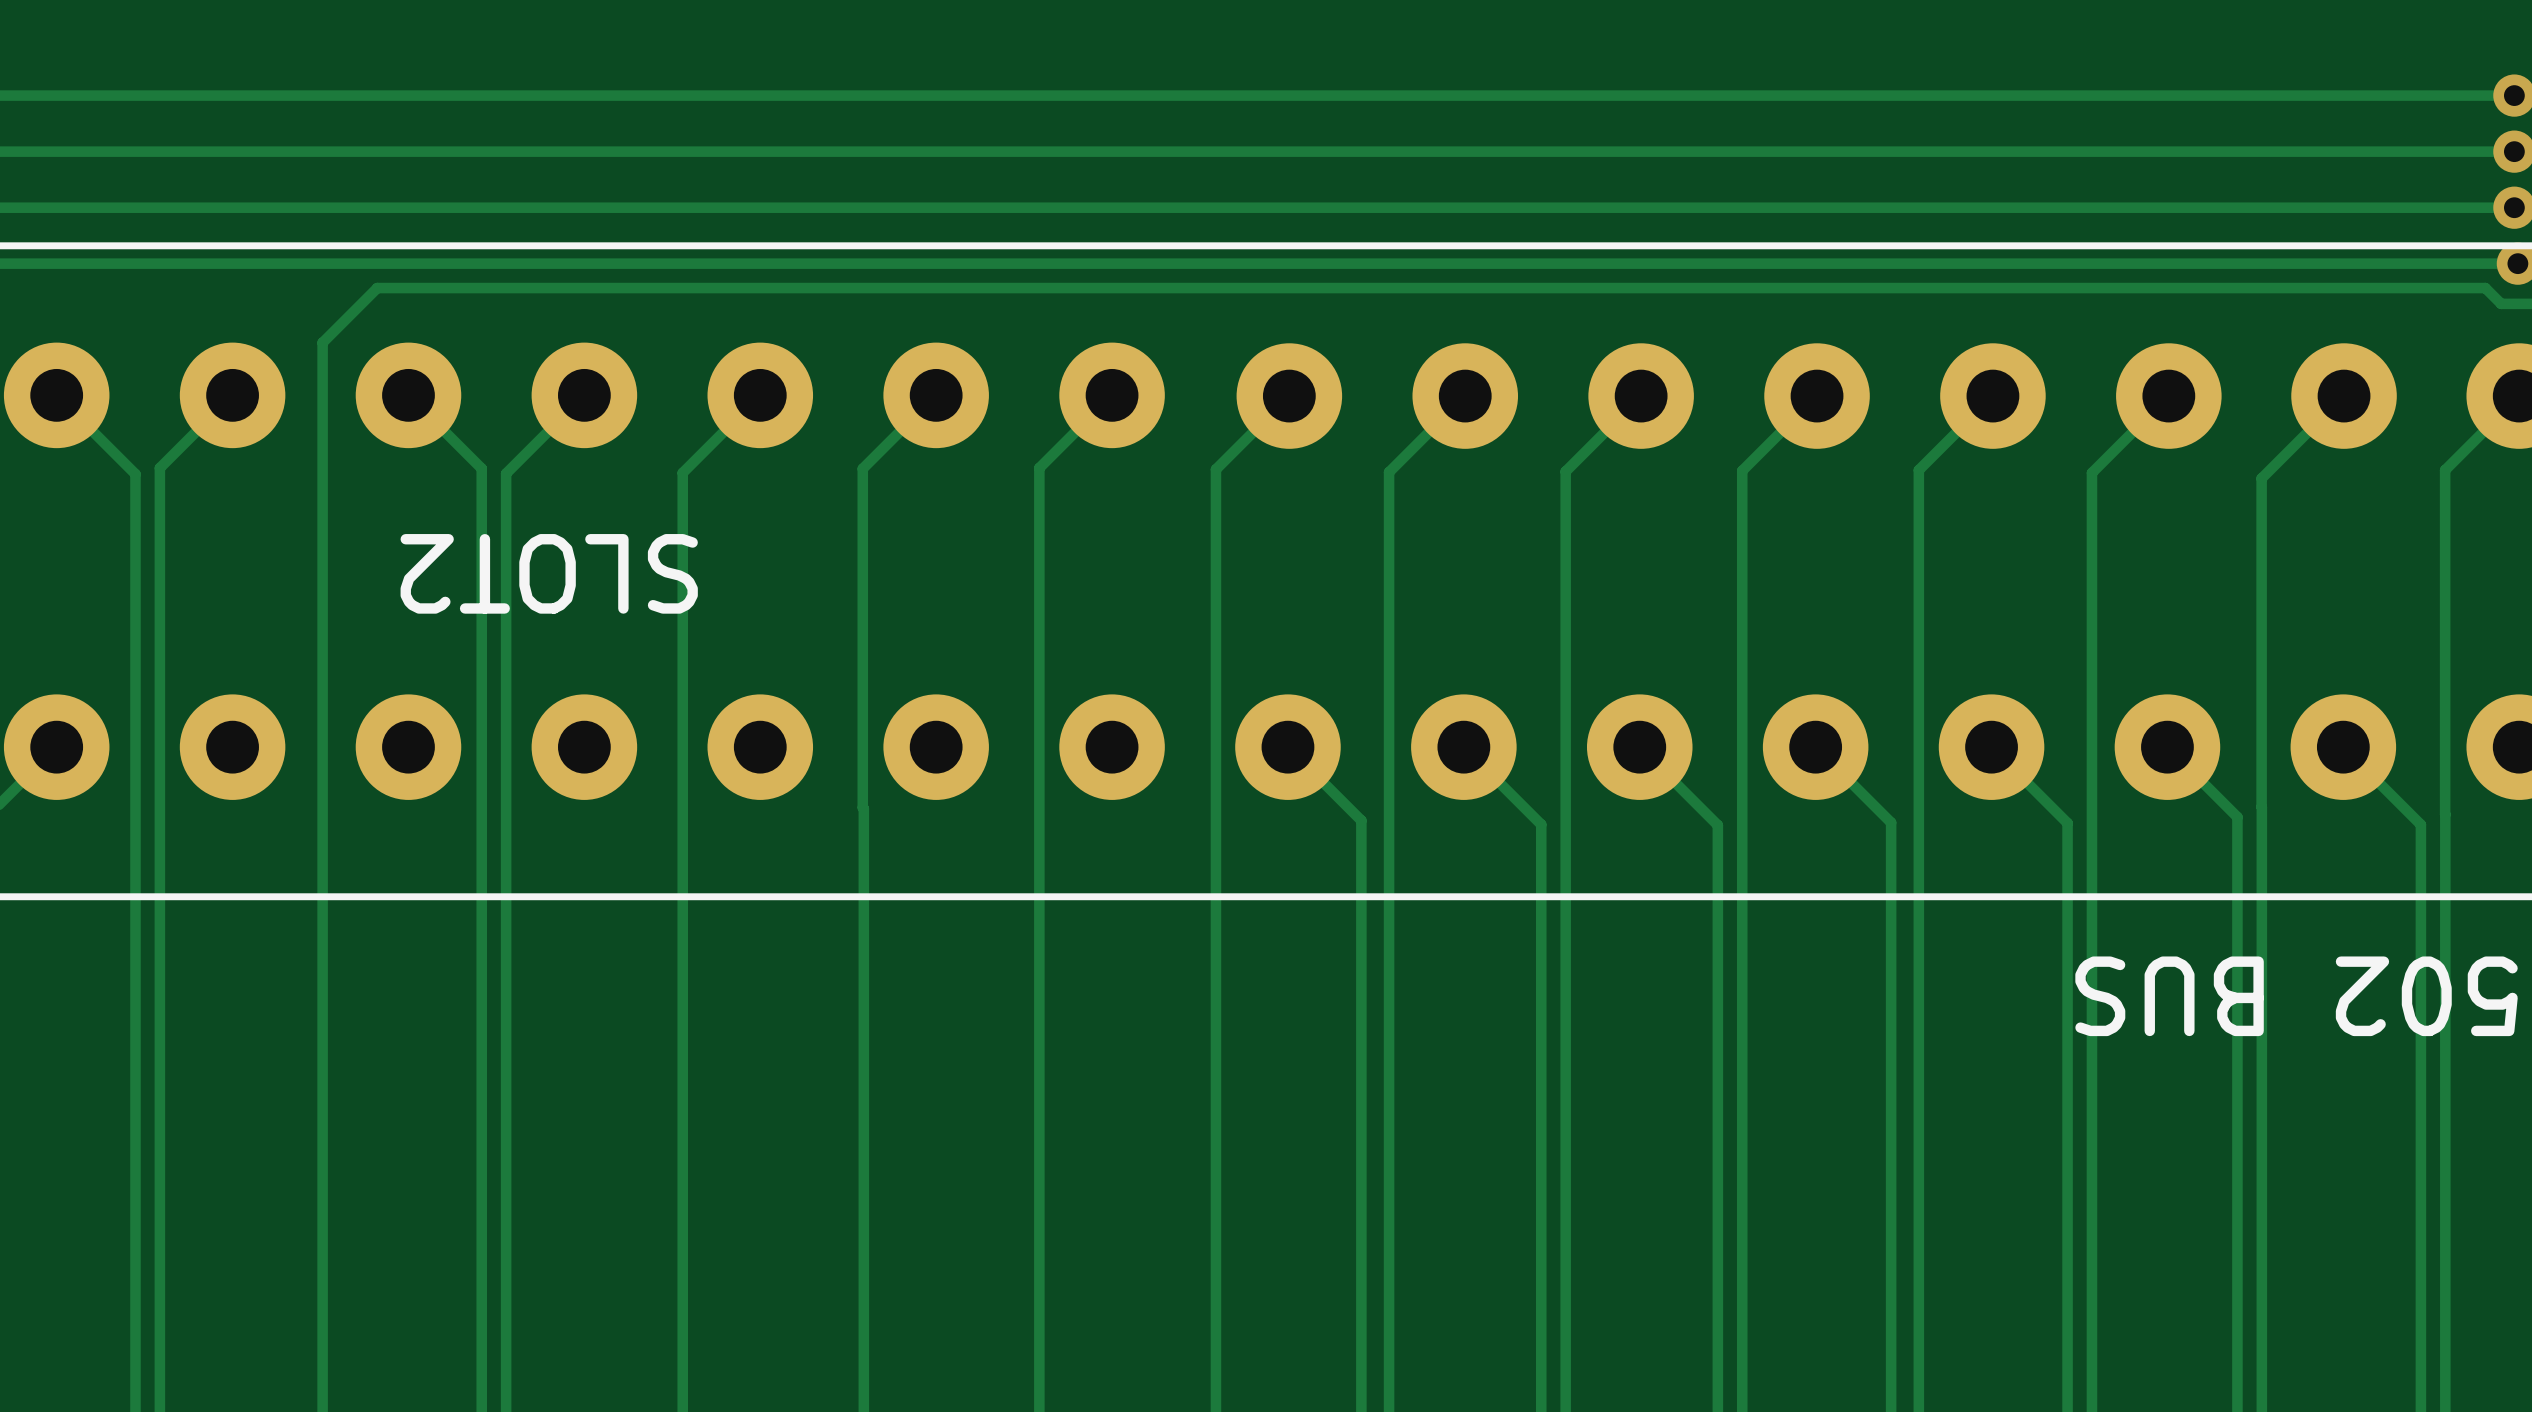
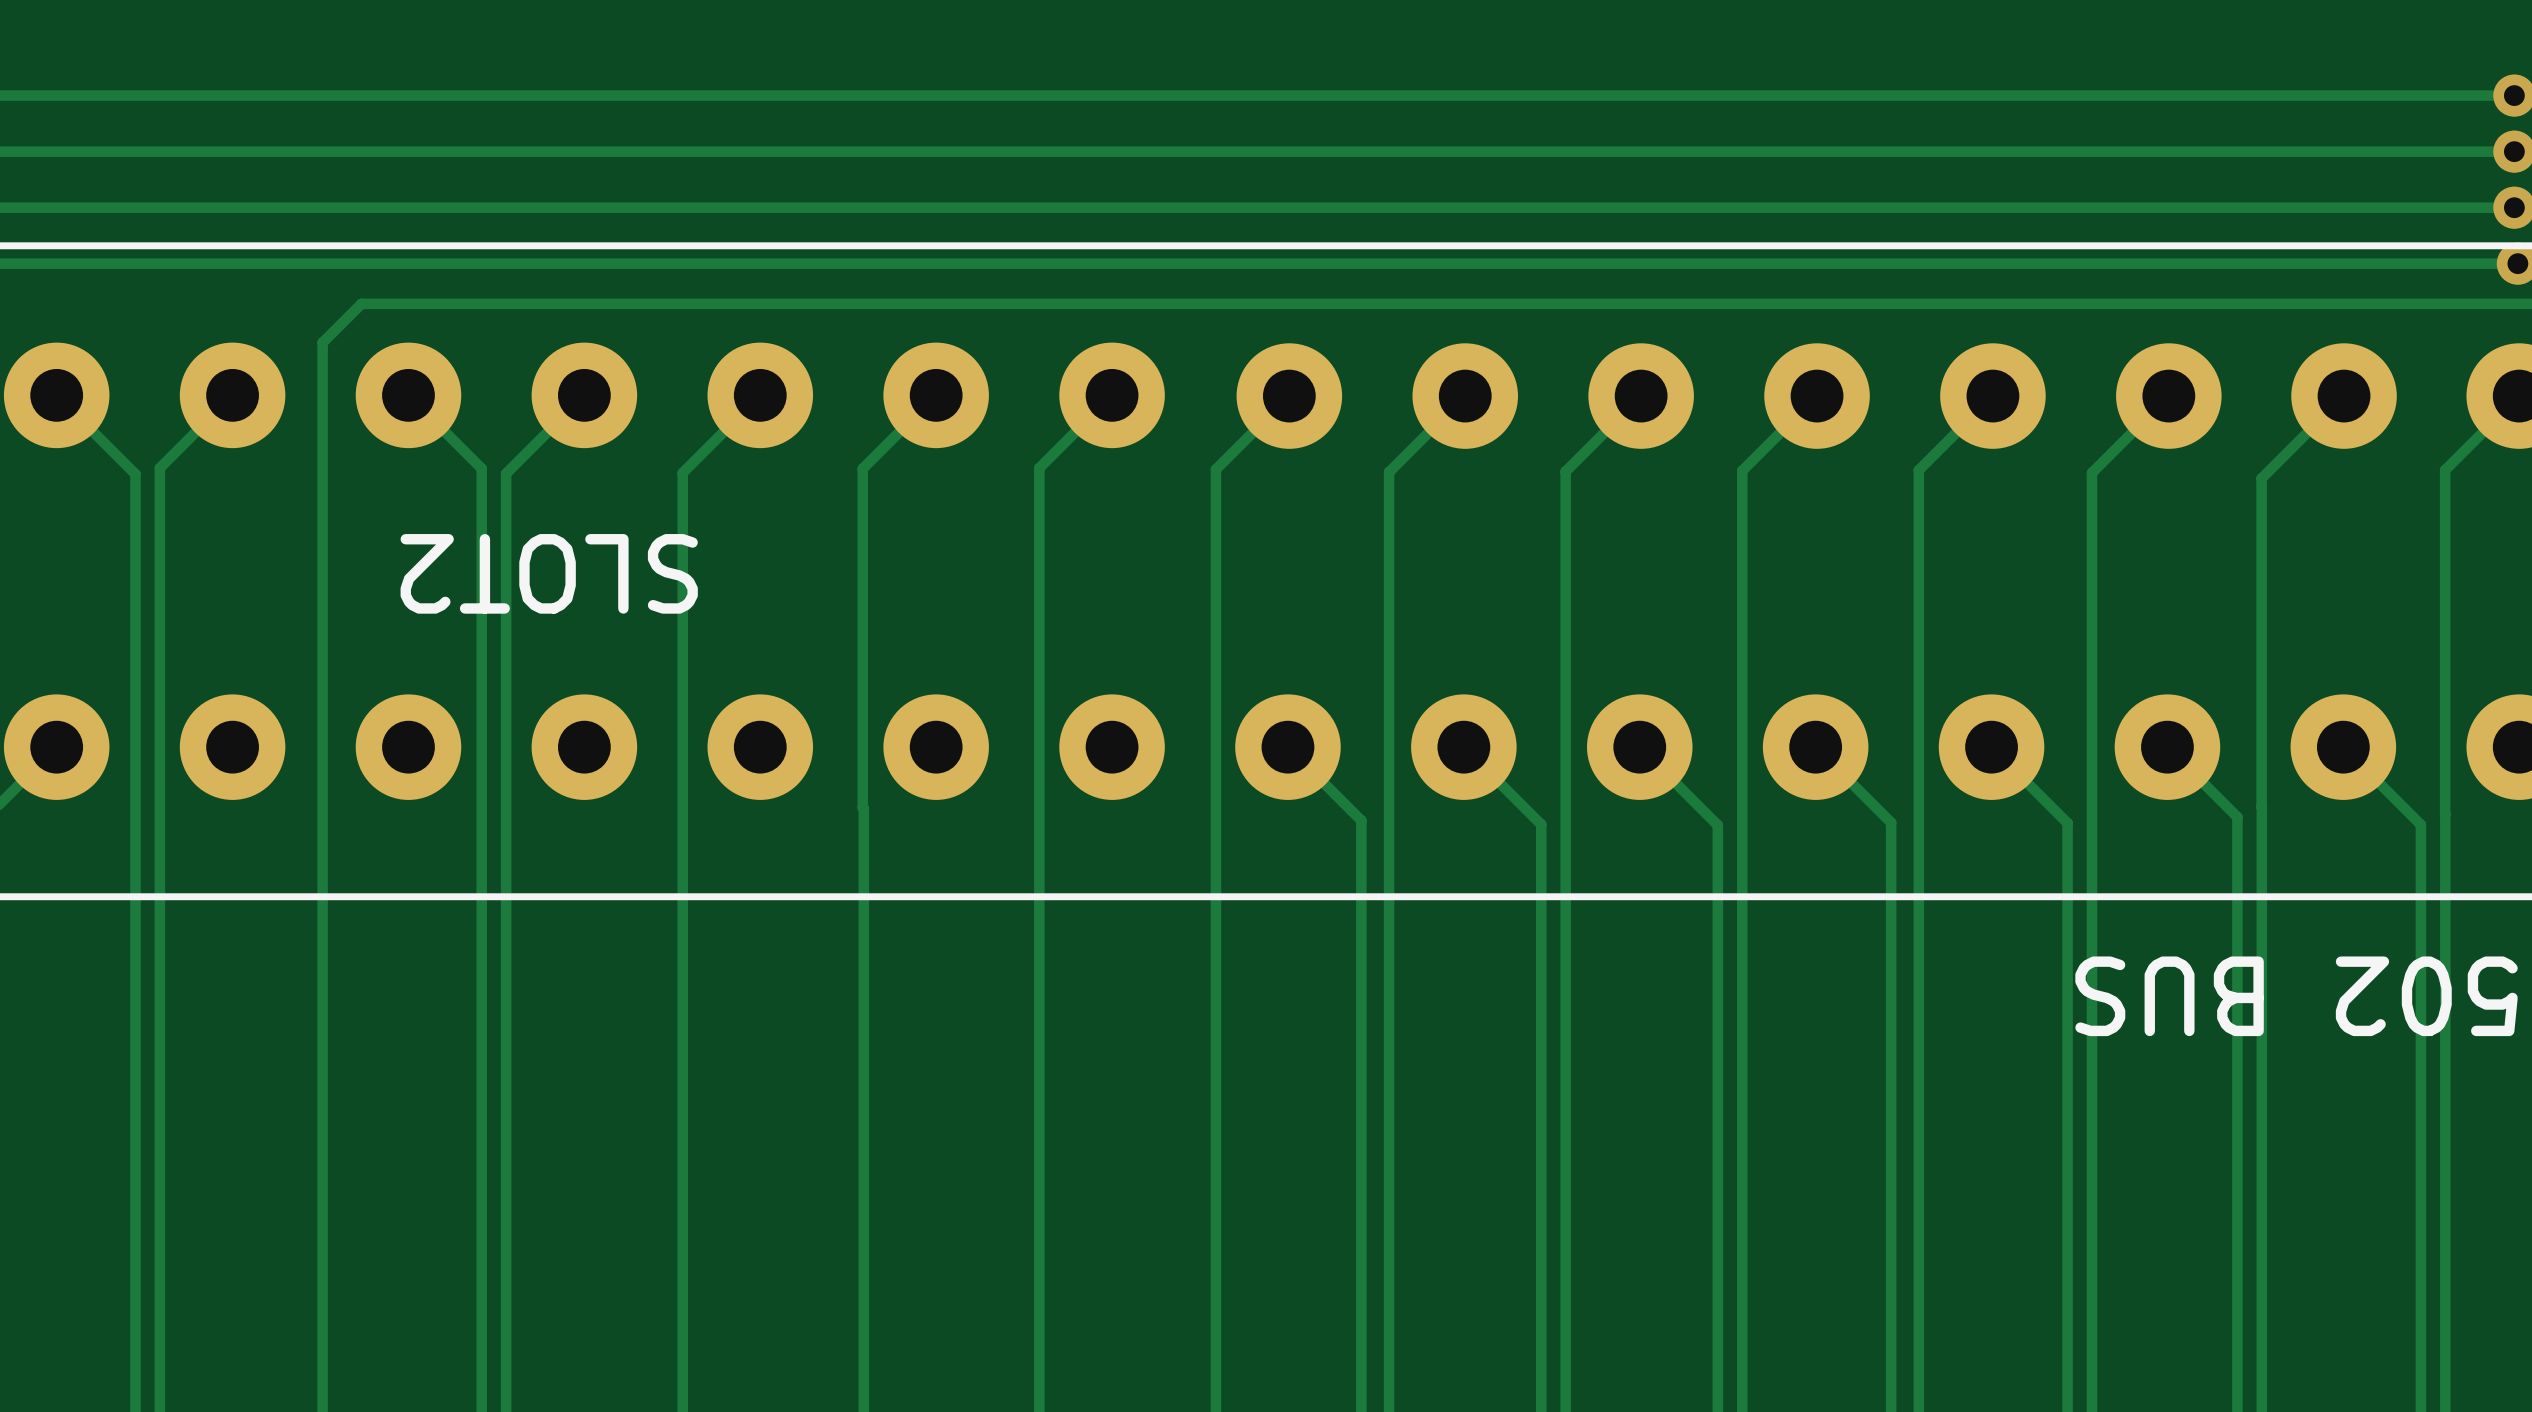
track: (361, 303) (377, 288) (2485, 288) (2501, 303) -> (361, 303) (2501, 303)

